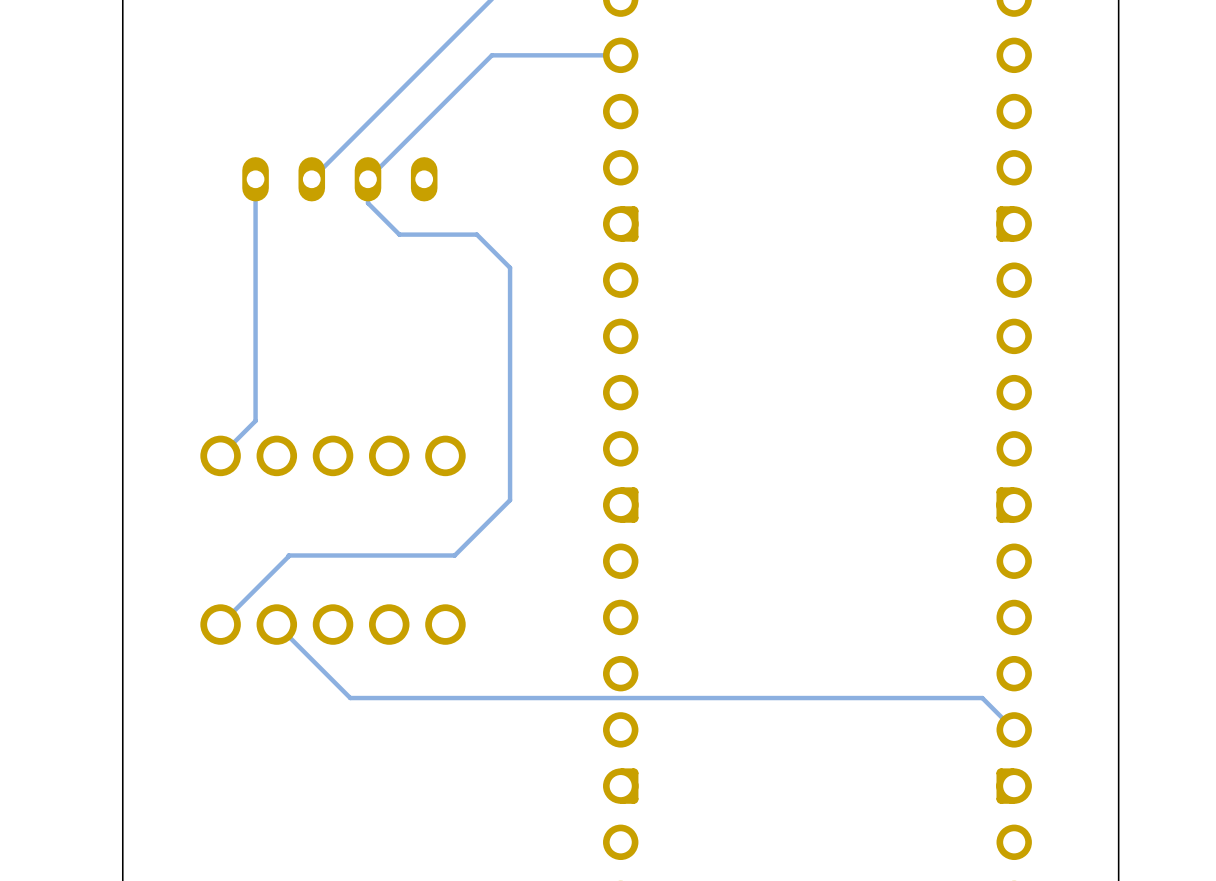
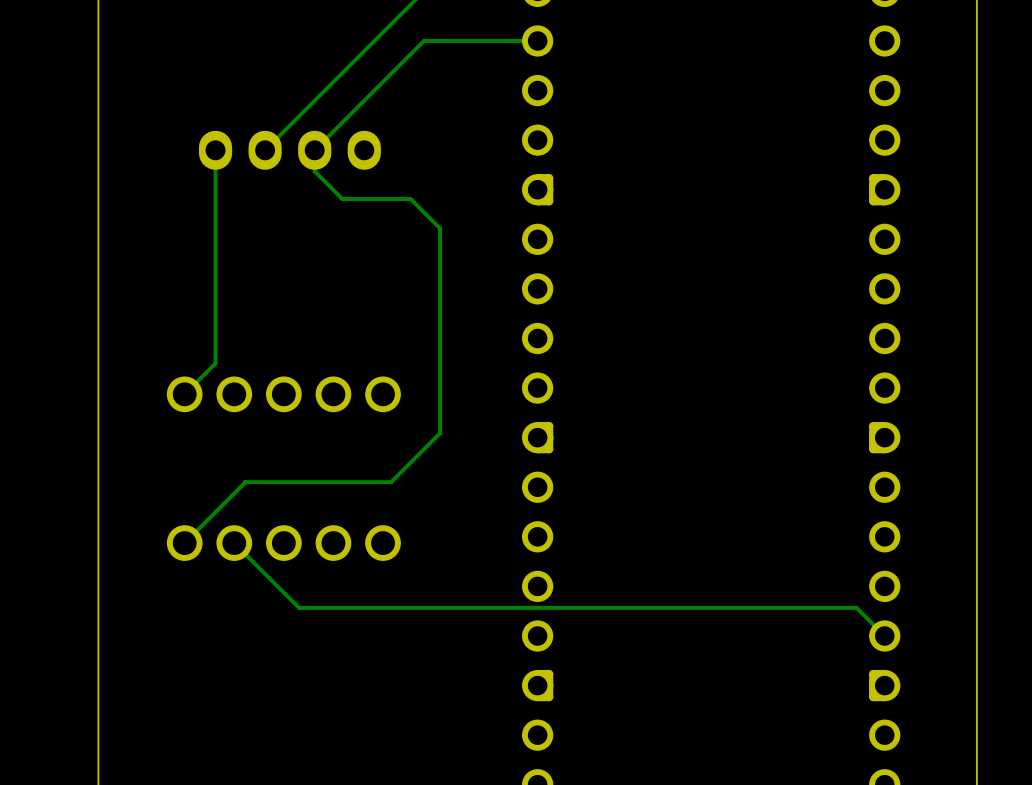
part footprint: [242, 157, 438, 202] -> [198, 130, 381, 170]

